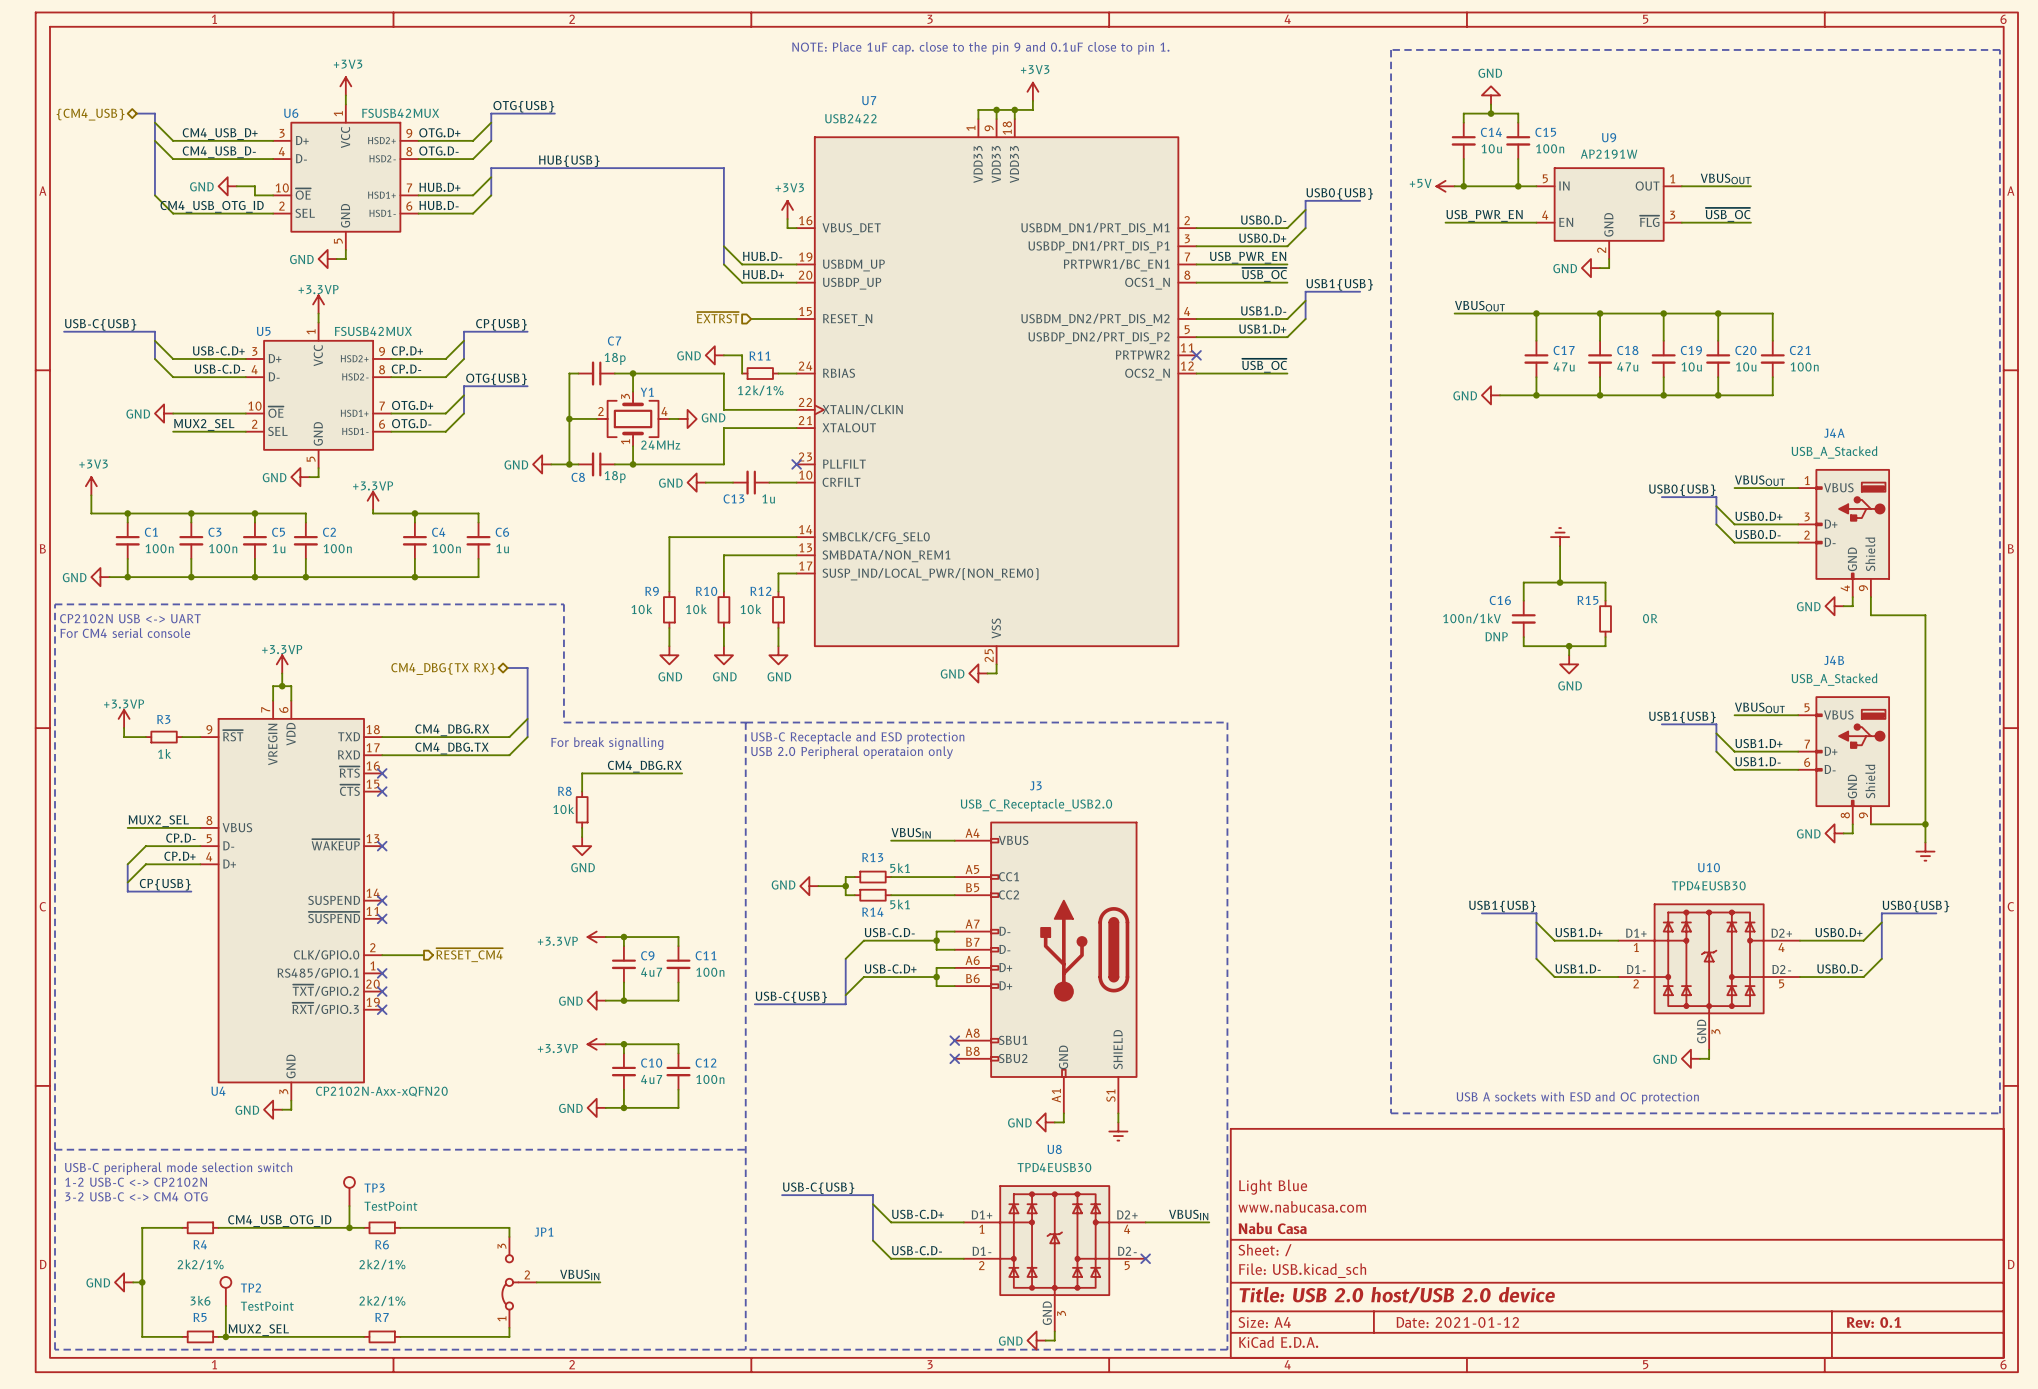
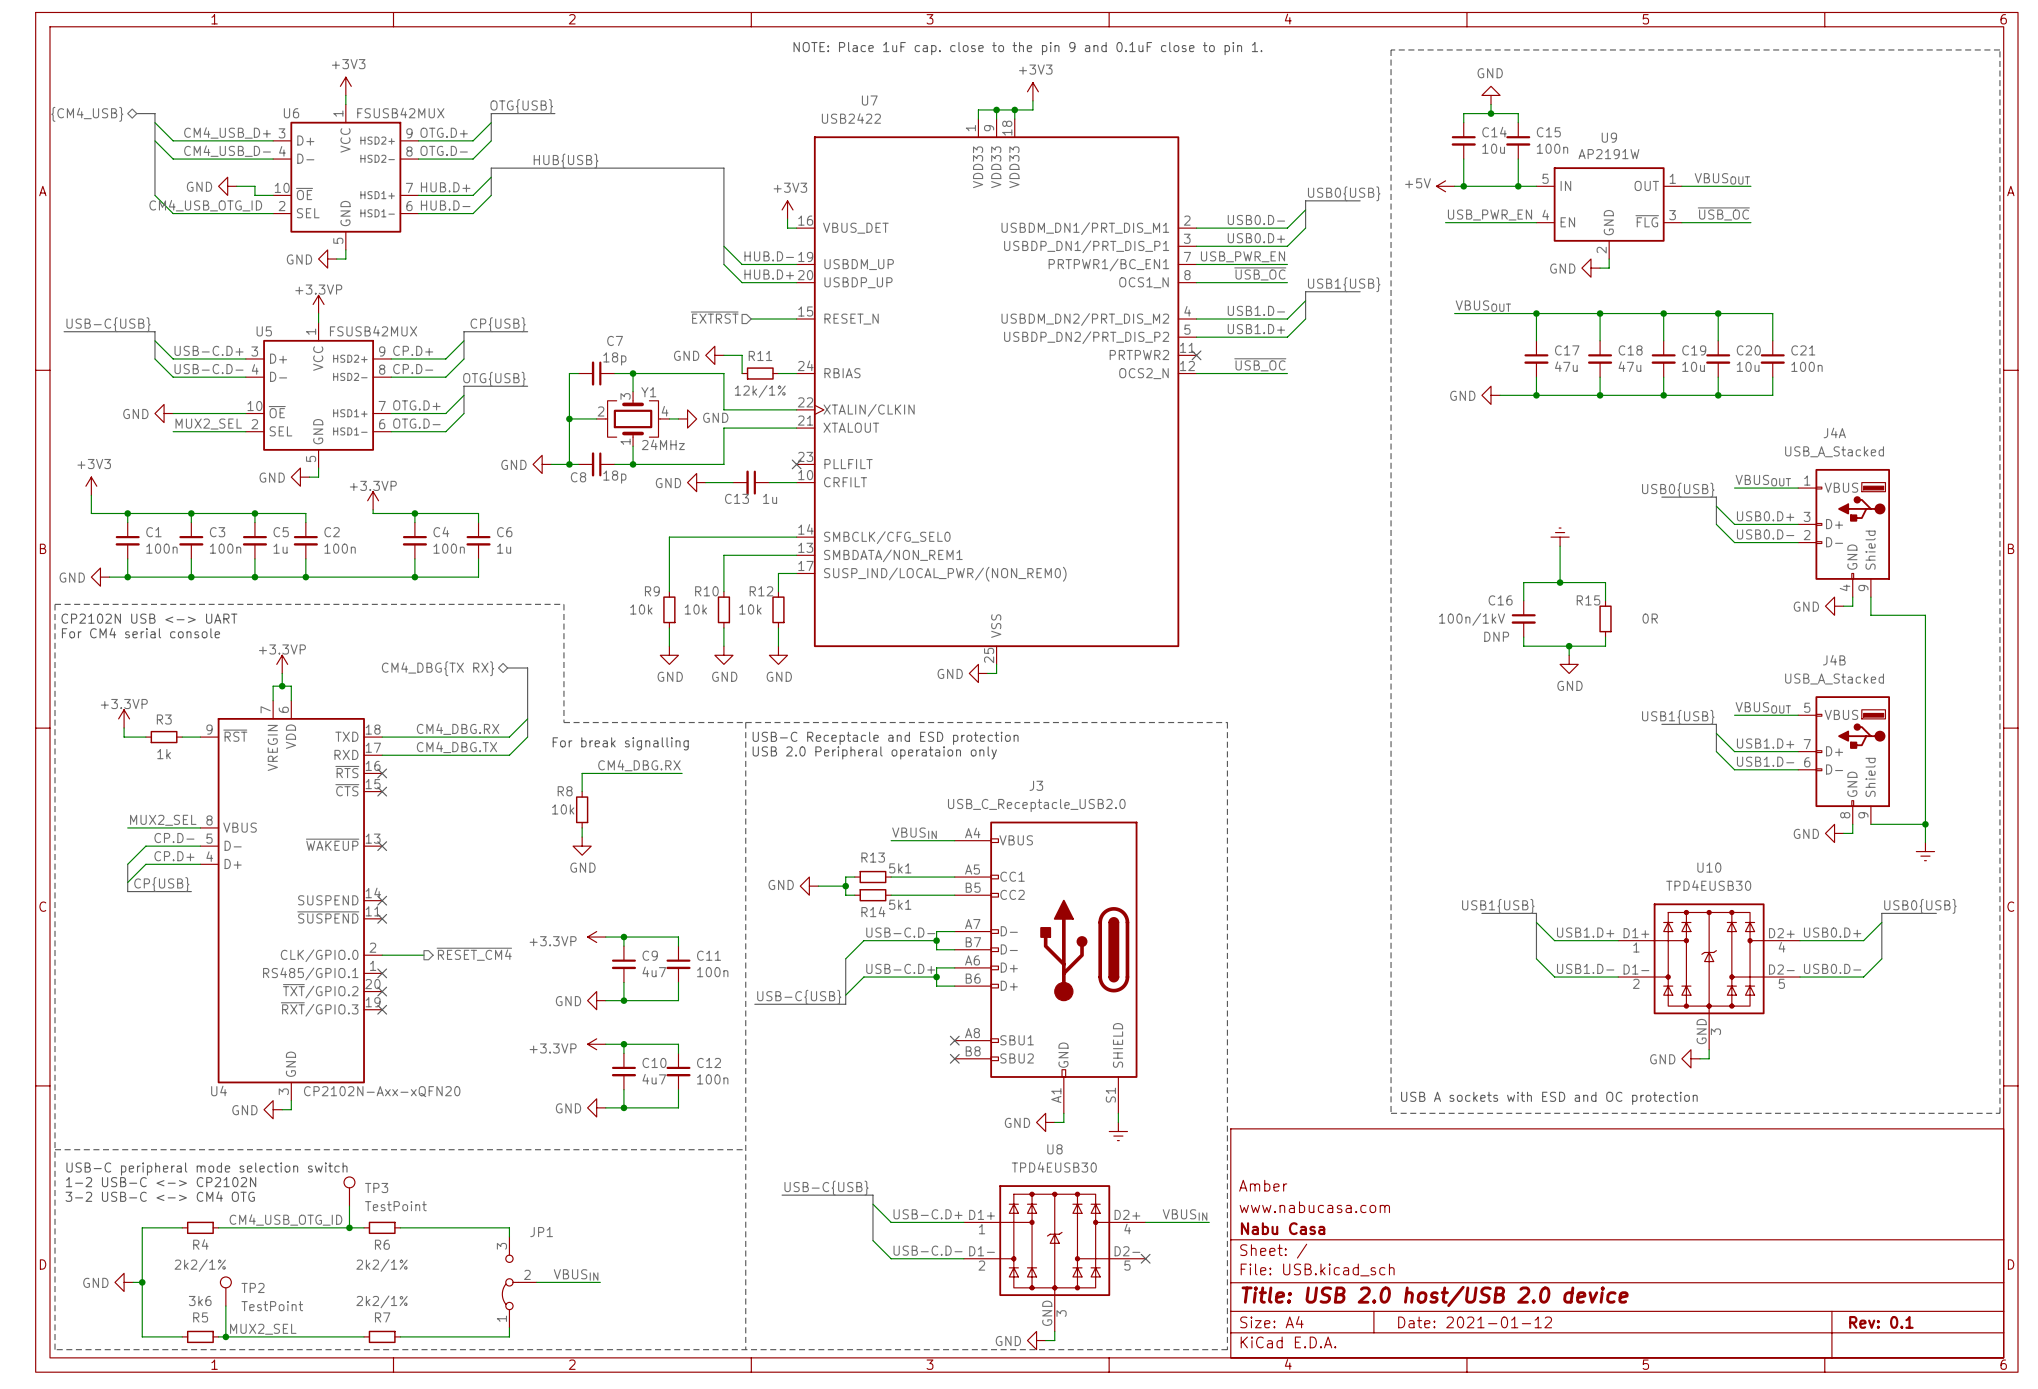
title block: Light Blue (1273, 1187) -> Amber (1263, 1185)

